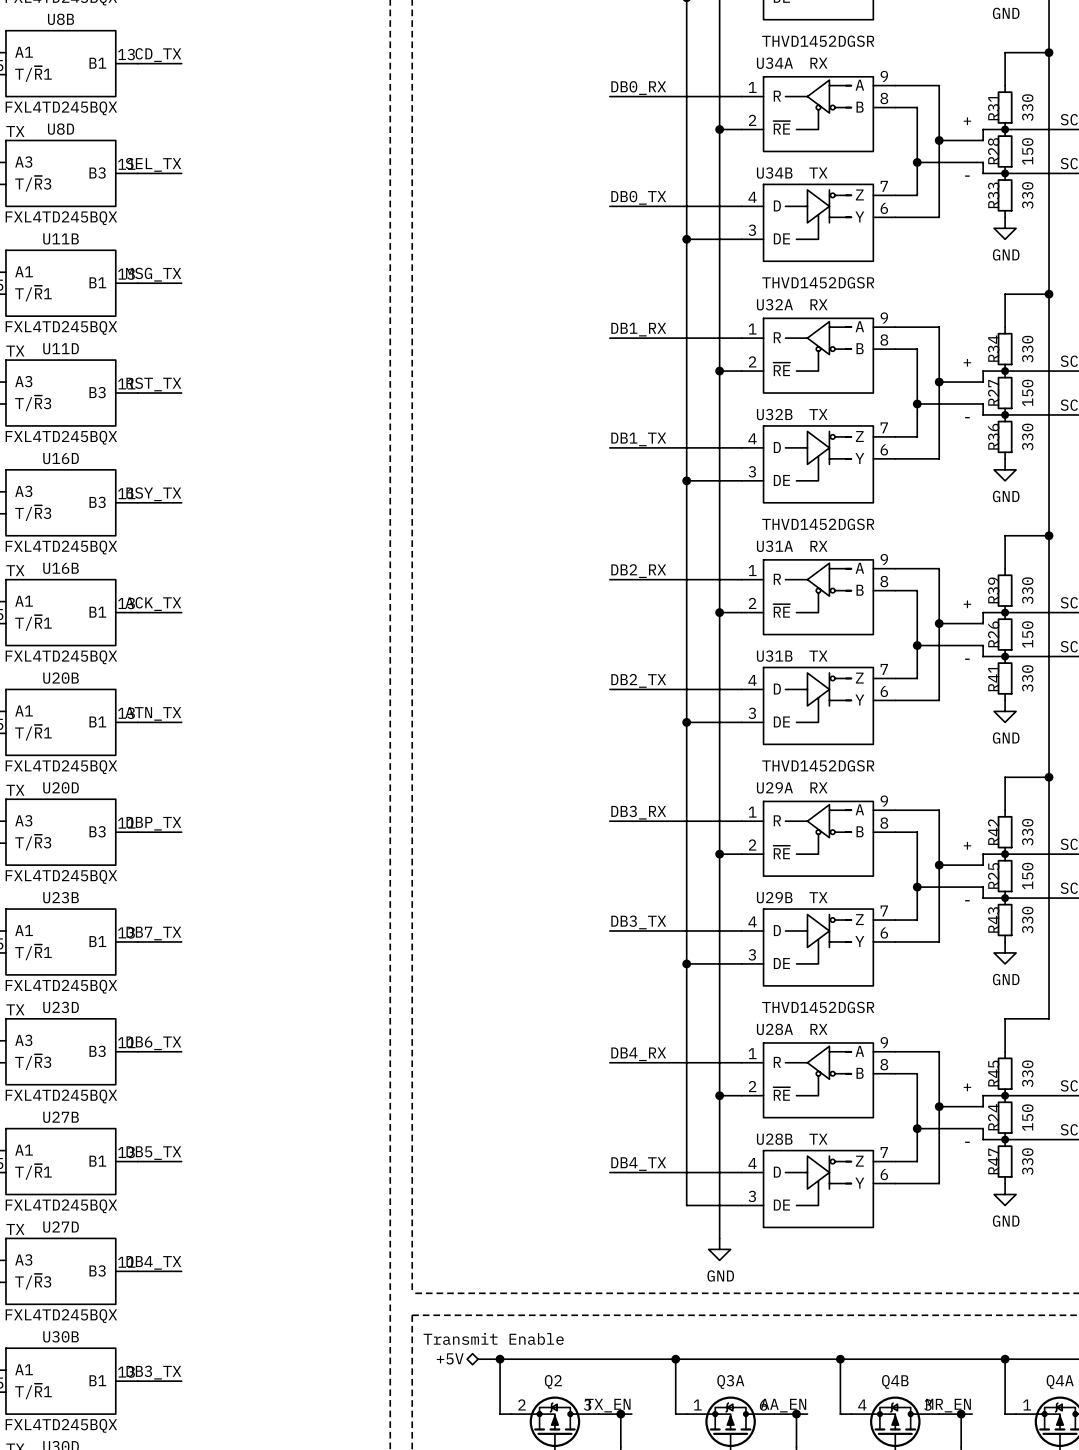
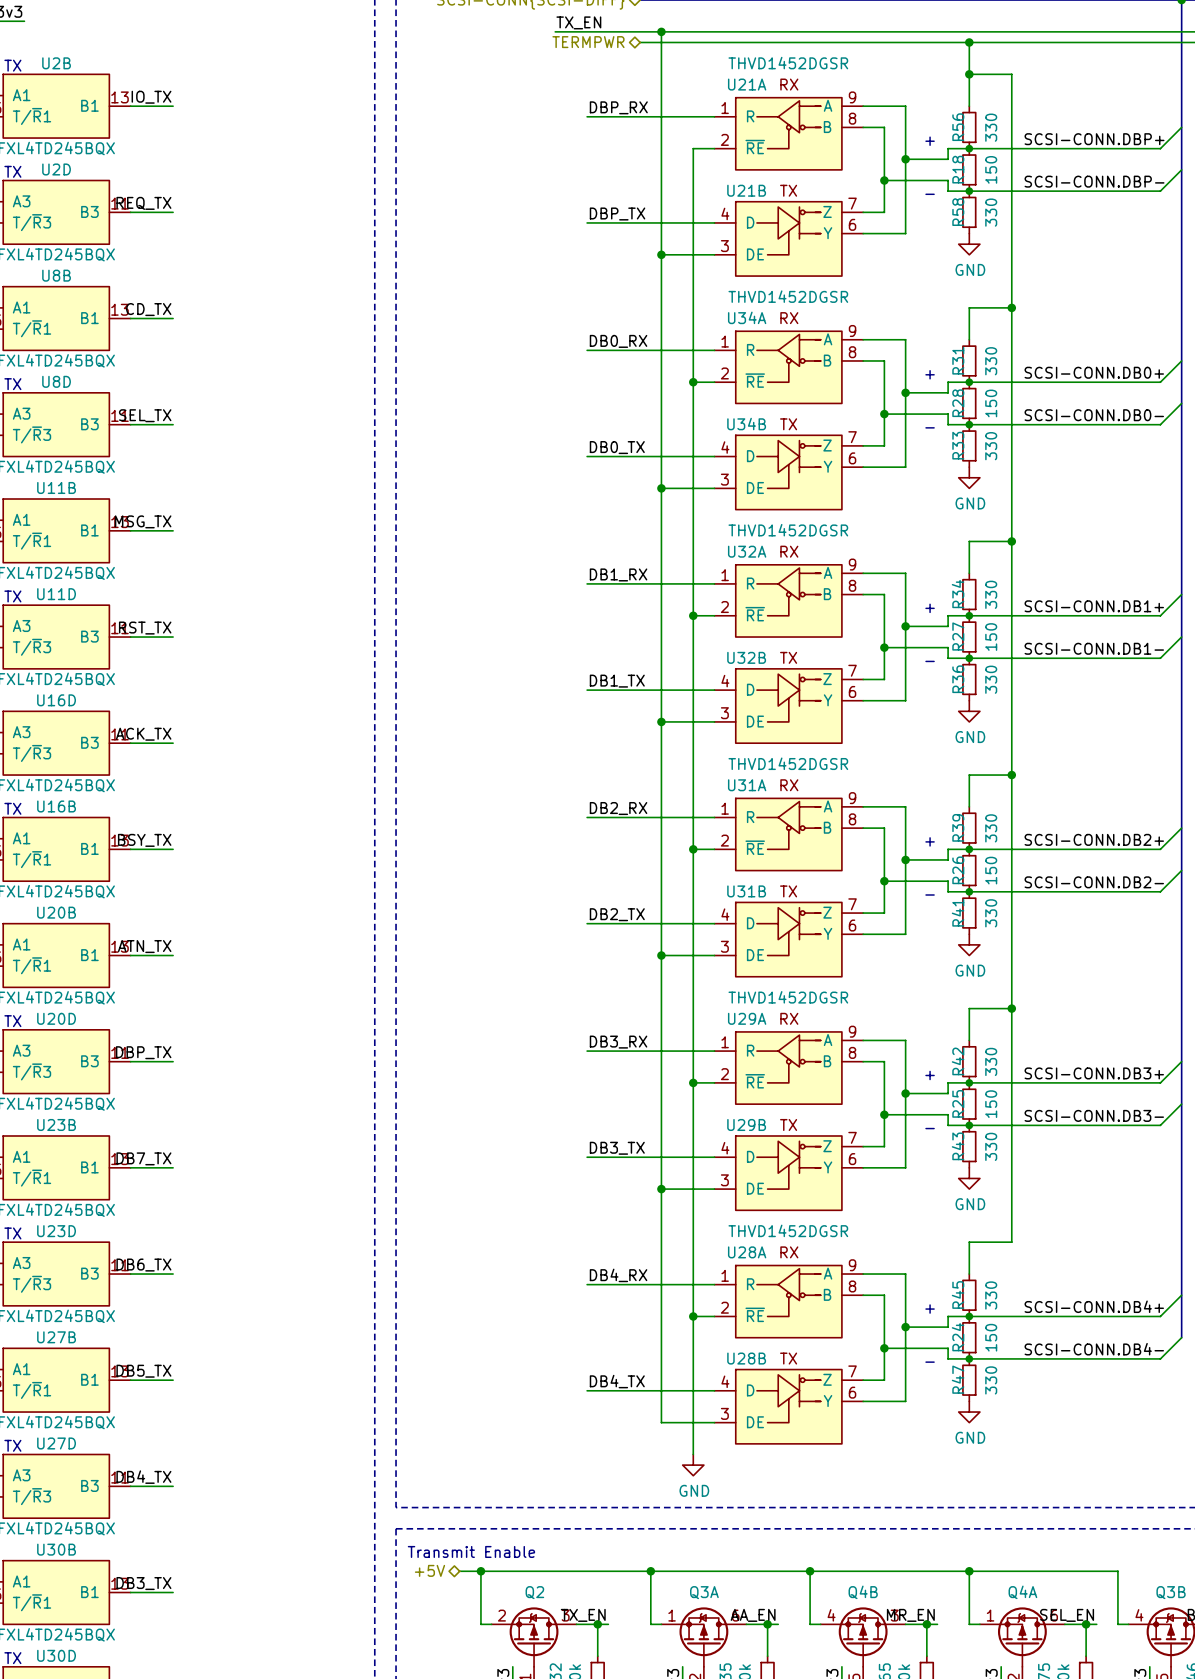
label: BSY_TX (153, 494) -> ACK_TX (143, 734)
label: ACK_TX (153, 604) -> BSY_TX (144, 840)

